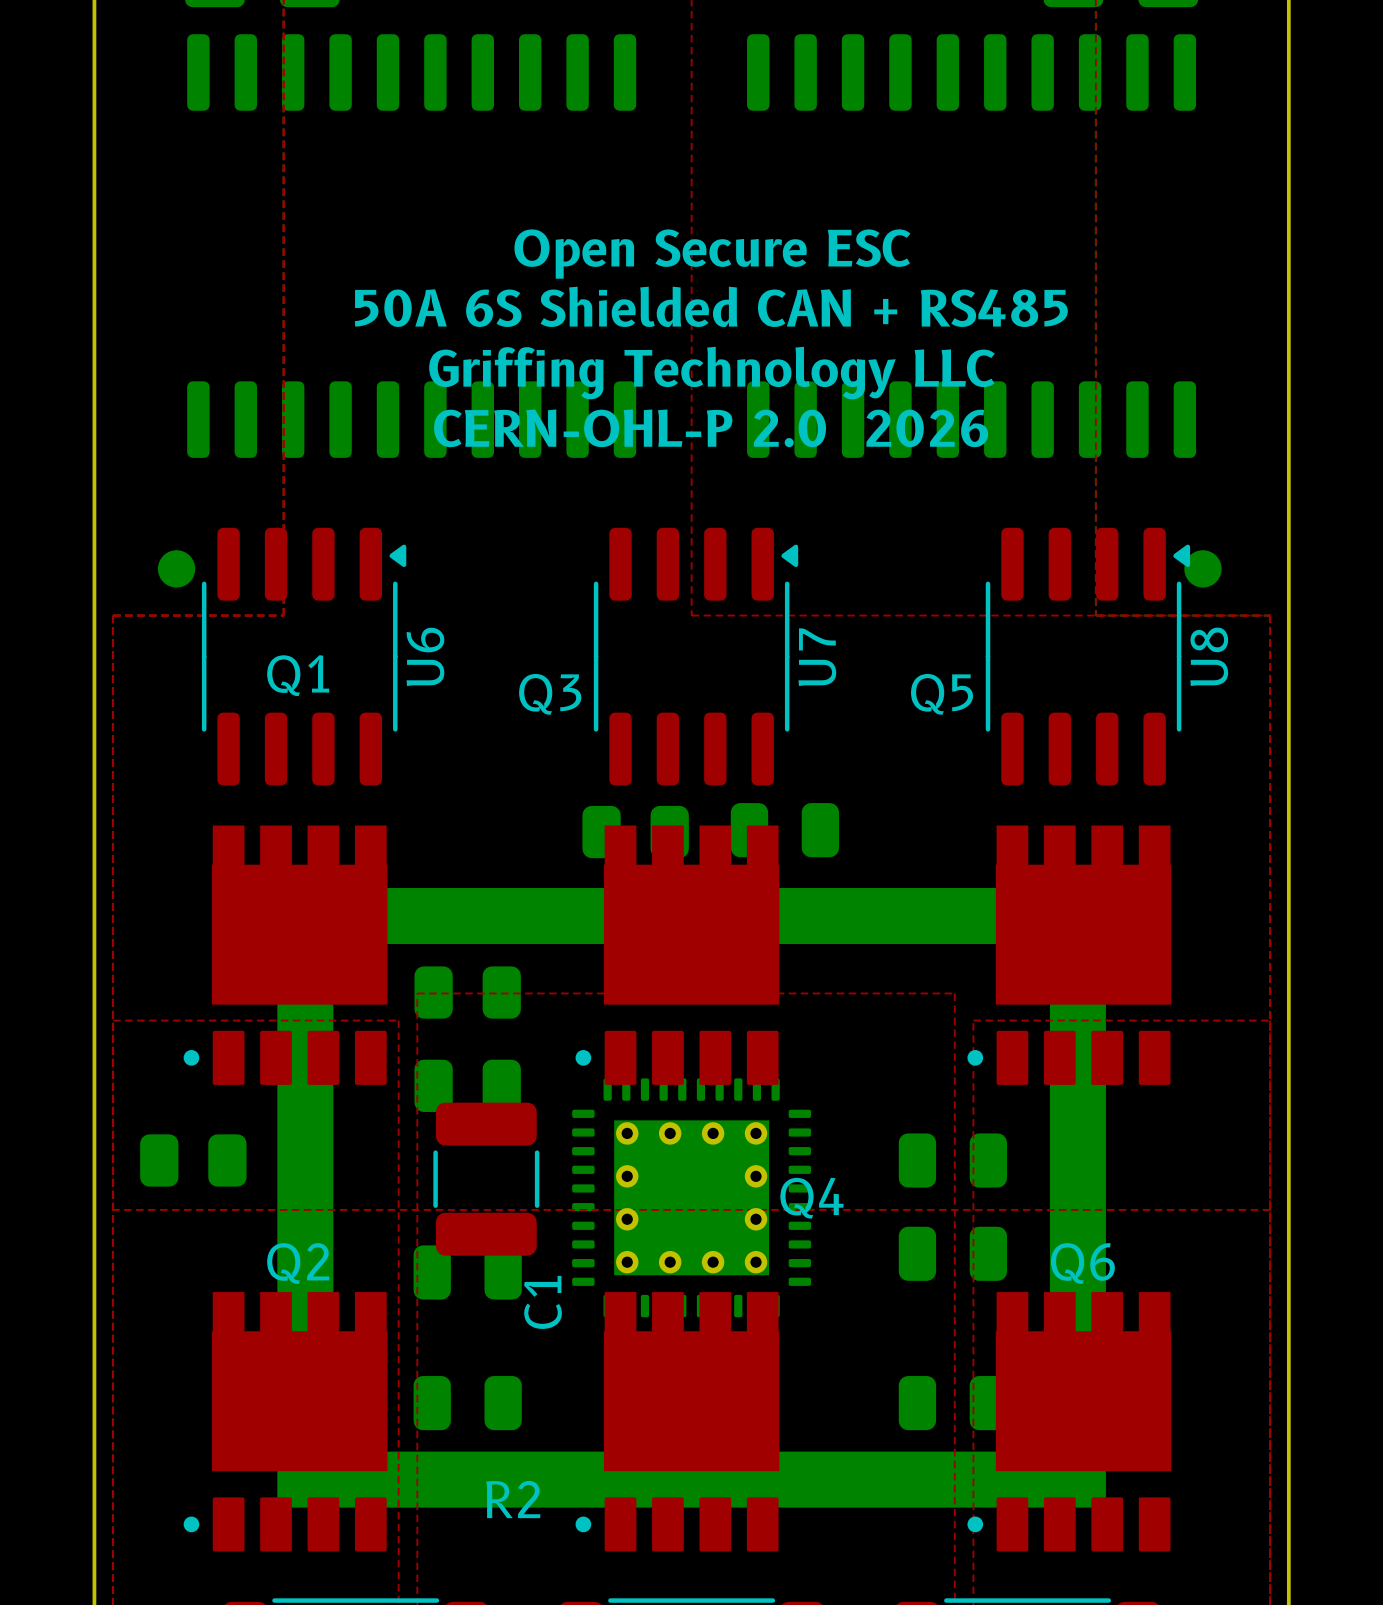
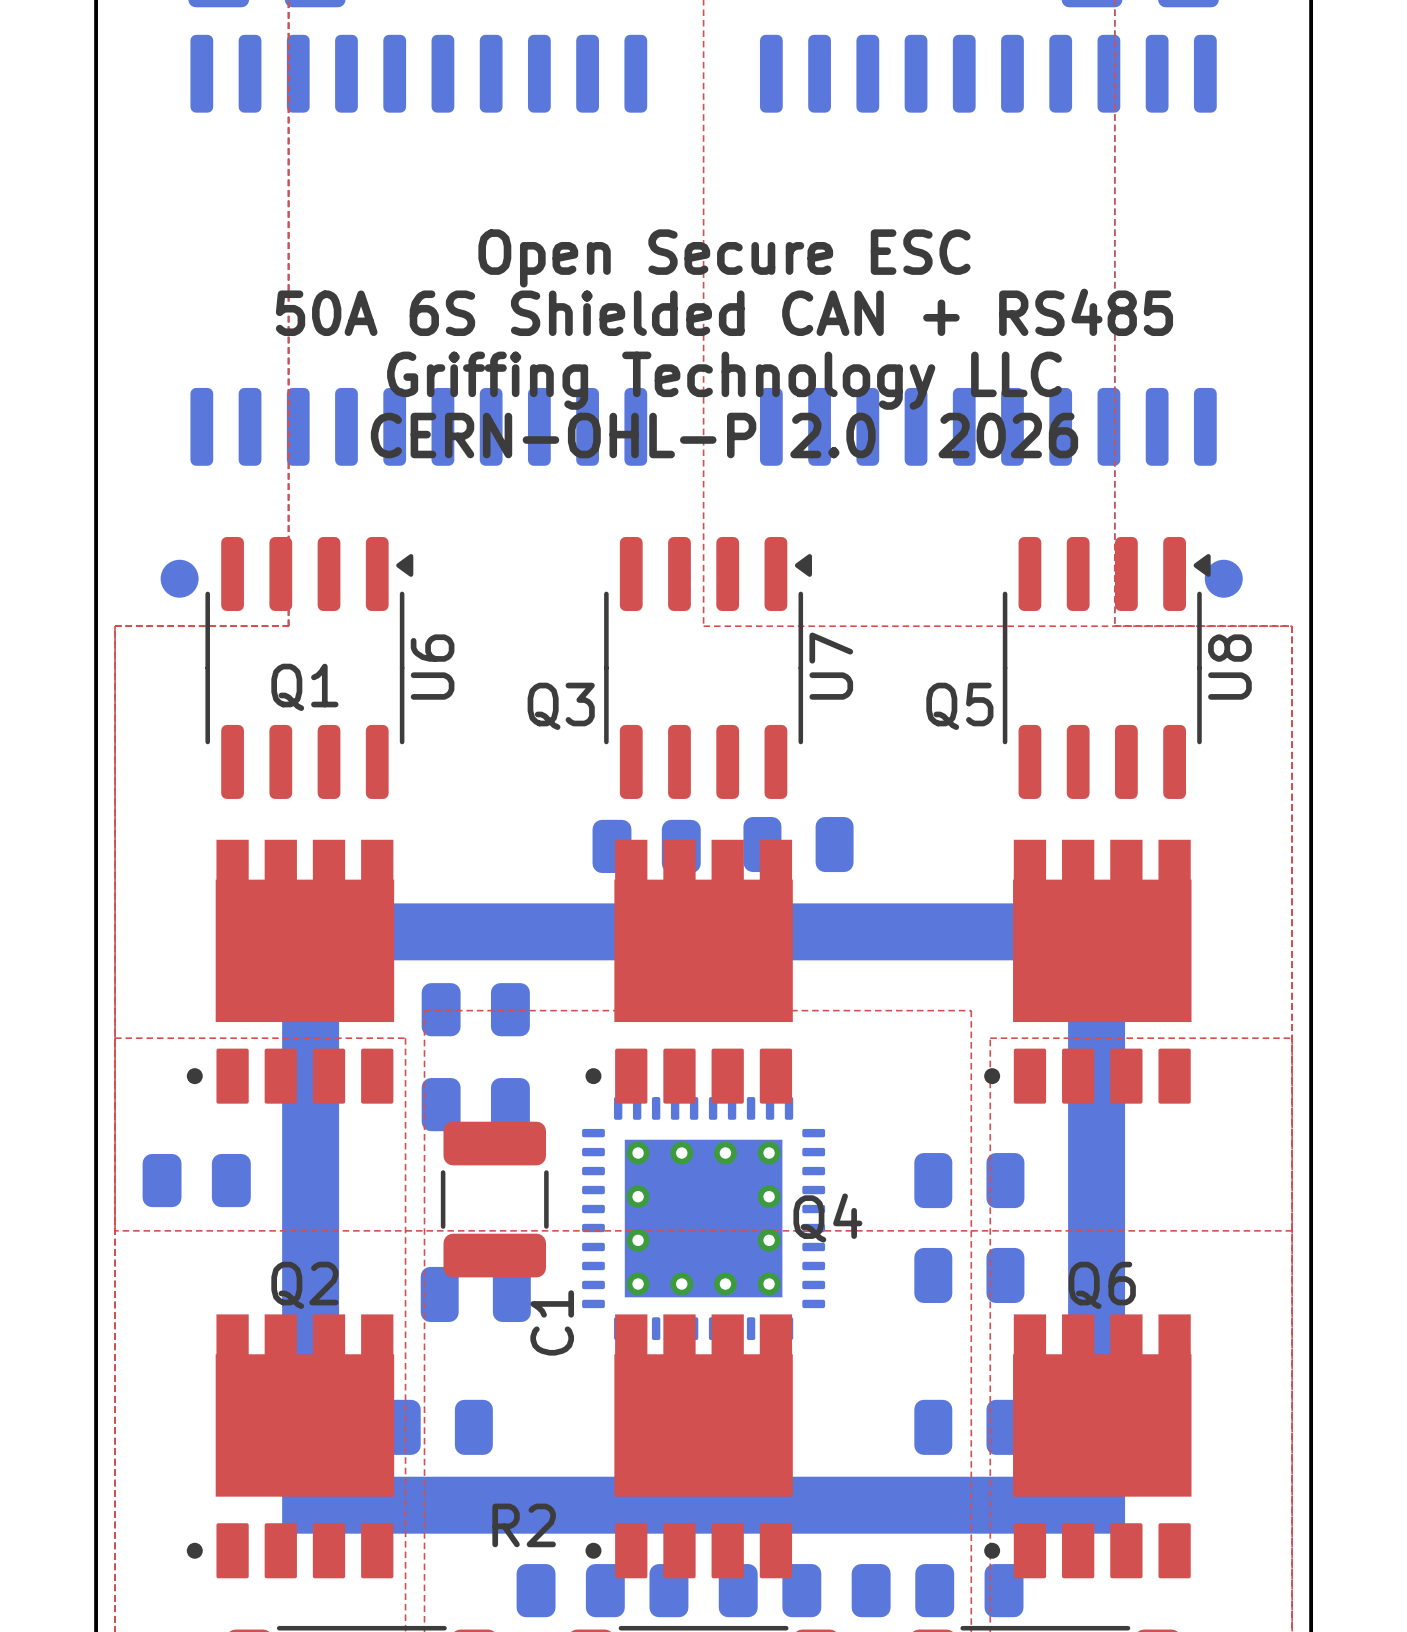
part position: (467, 1403) -> (437, 1427)
part: none -> (570, 1590)
part: none -> (703, 1590)
part: none -> (836, 1590)
part: none -> (969, 1590)

